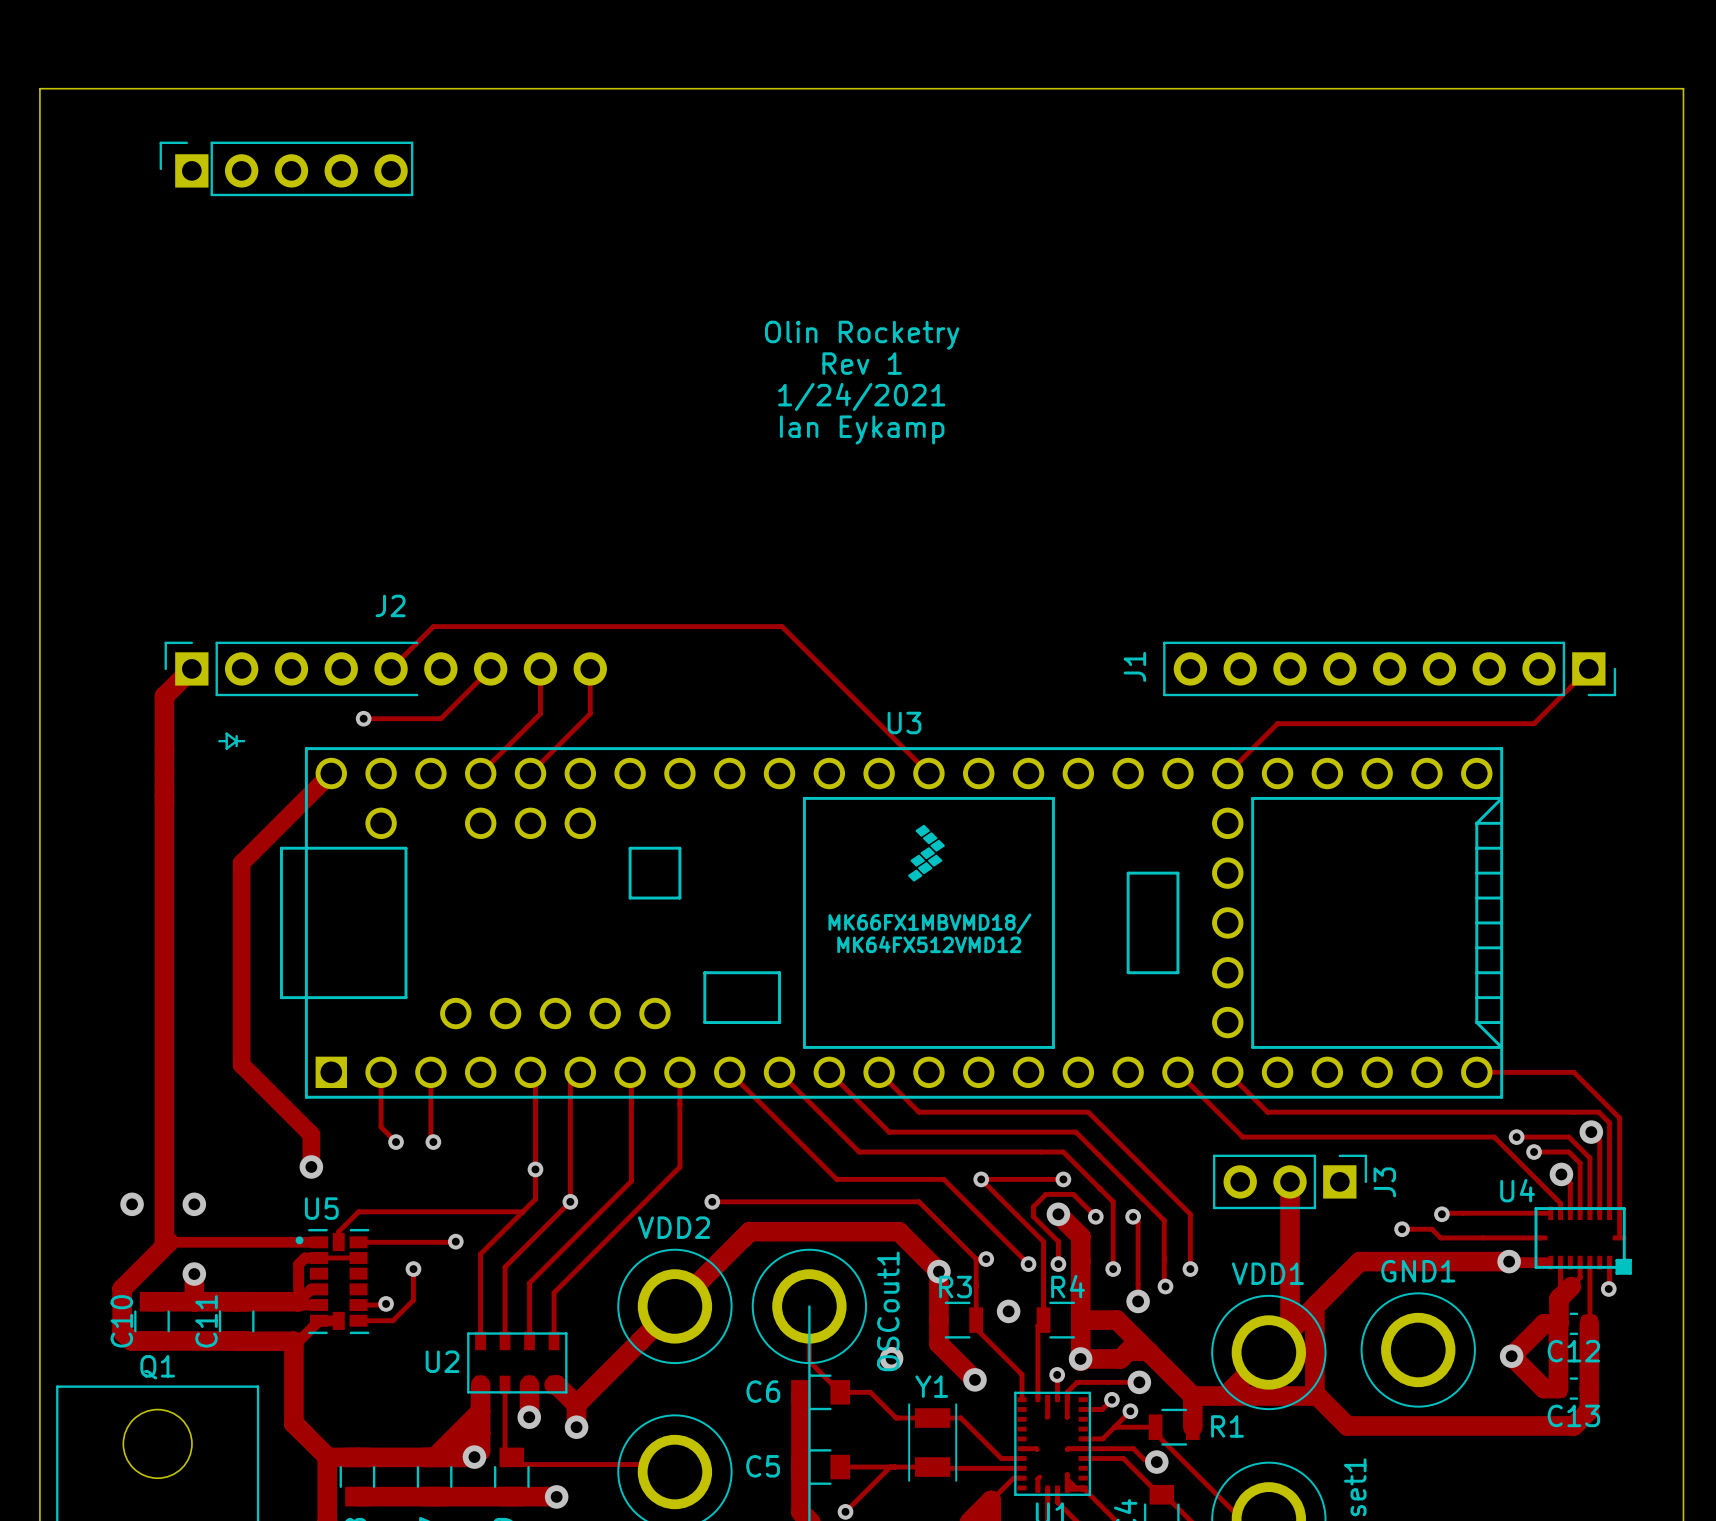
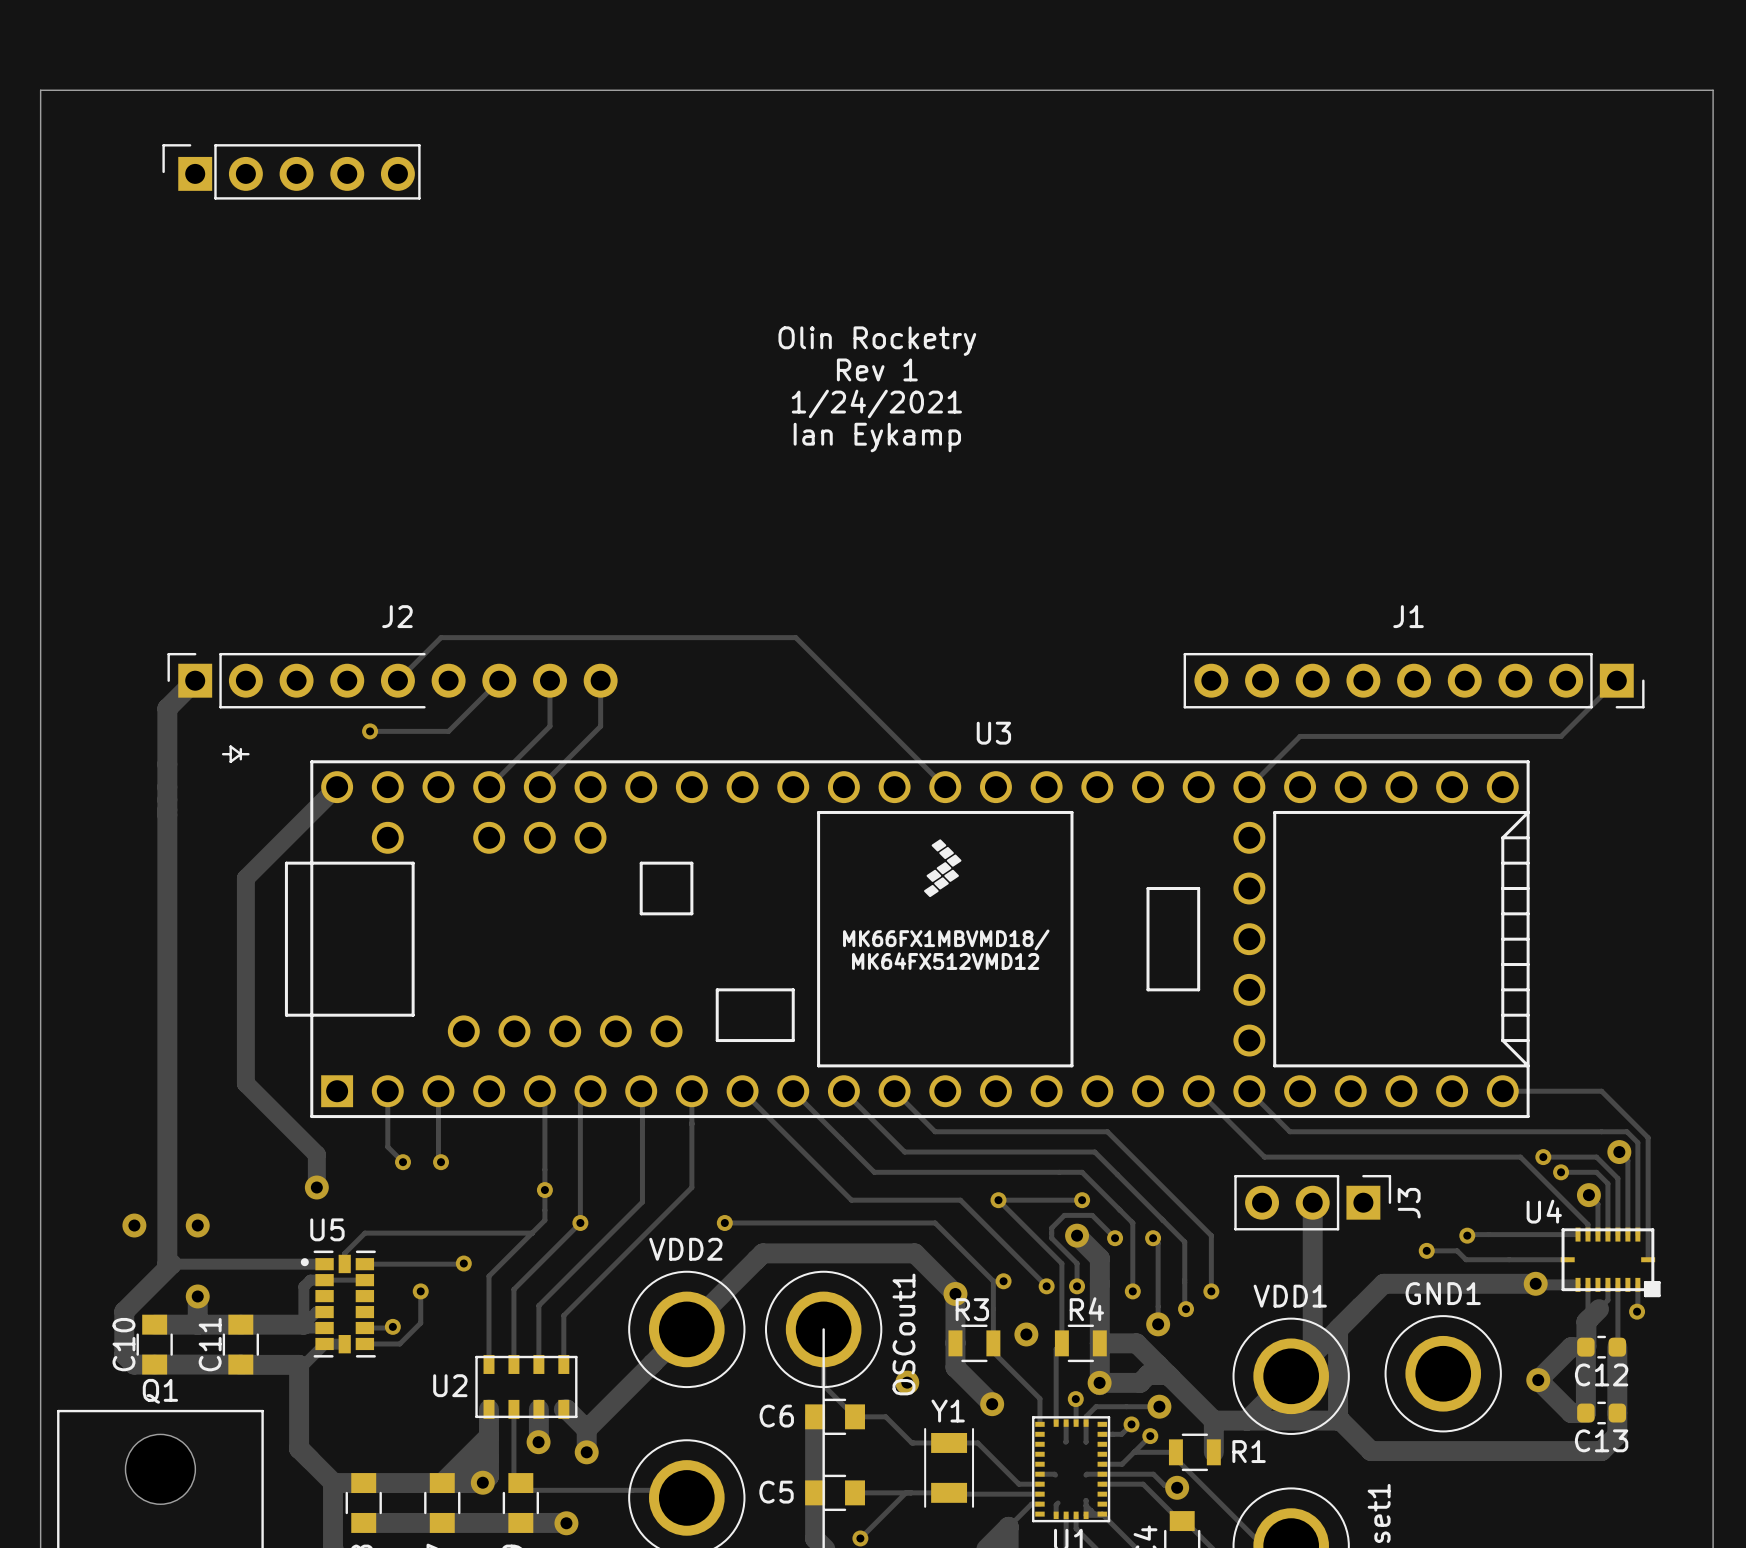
J1 name rotation: 0° (1134, 666) -> 90° clockwise (1408, 616)
J1 name position: J1 (1134, 666) -> J1 (1408, 616)
U3 name position: U3 (904, 722) -> U3 (993, 733)

